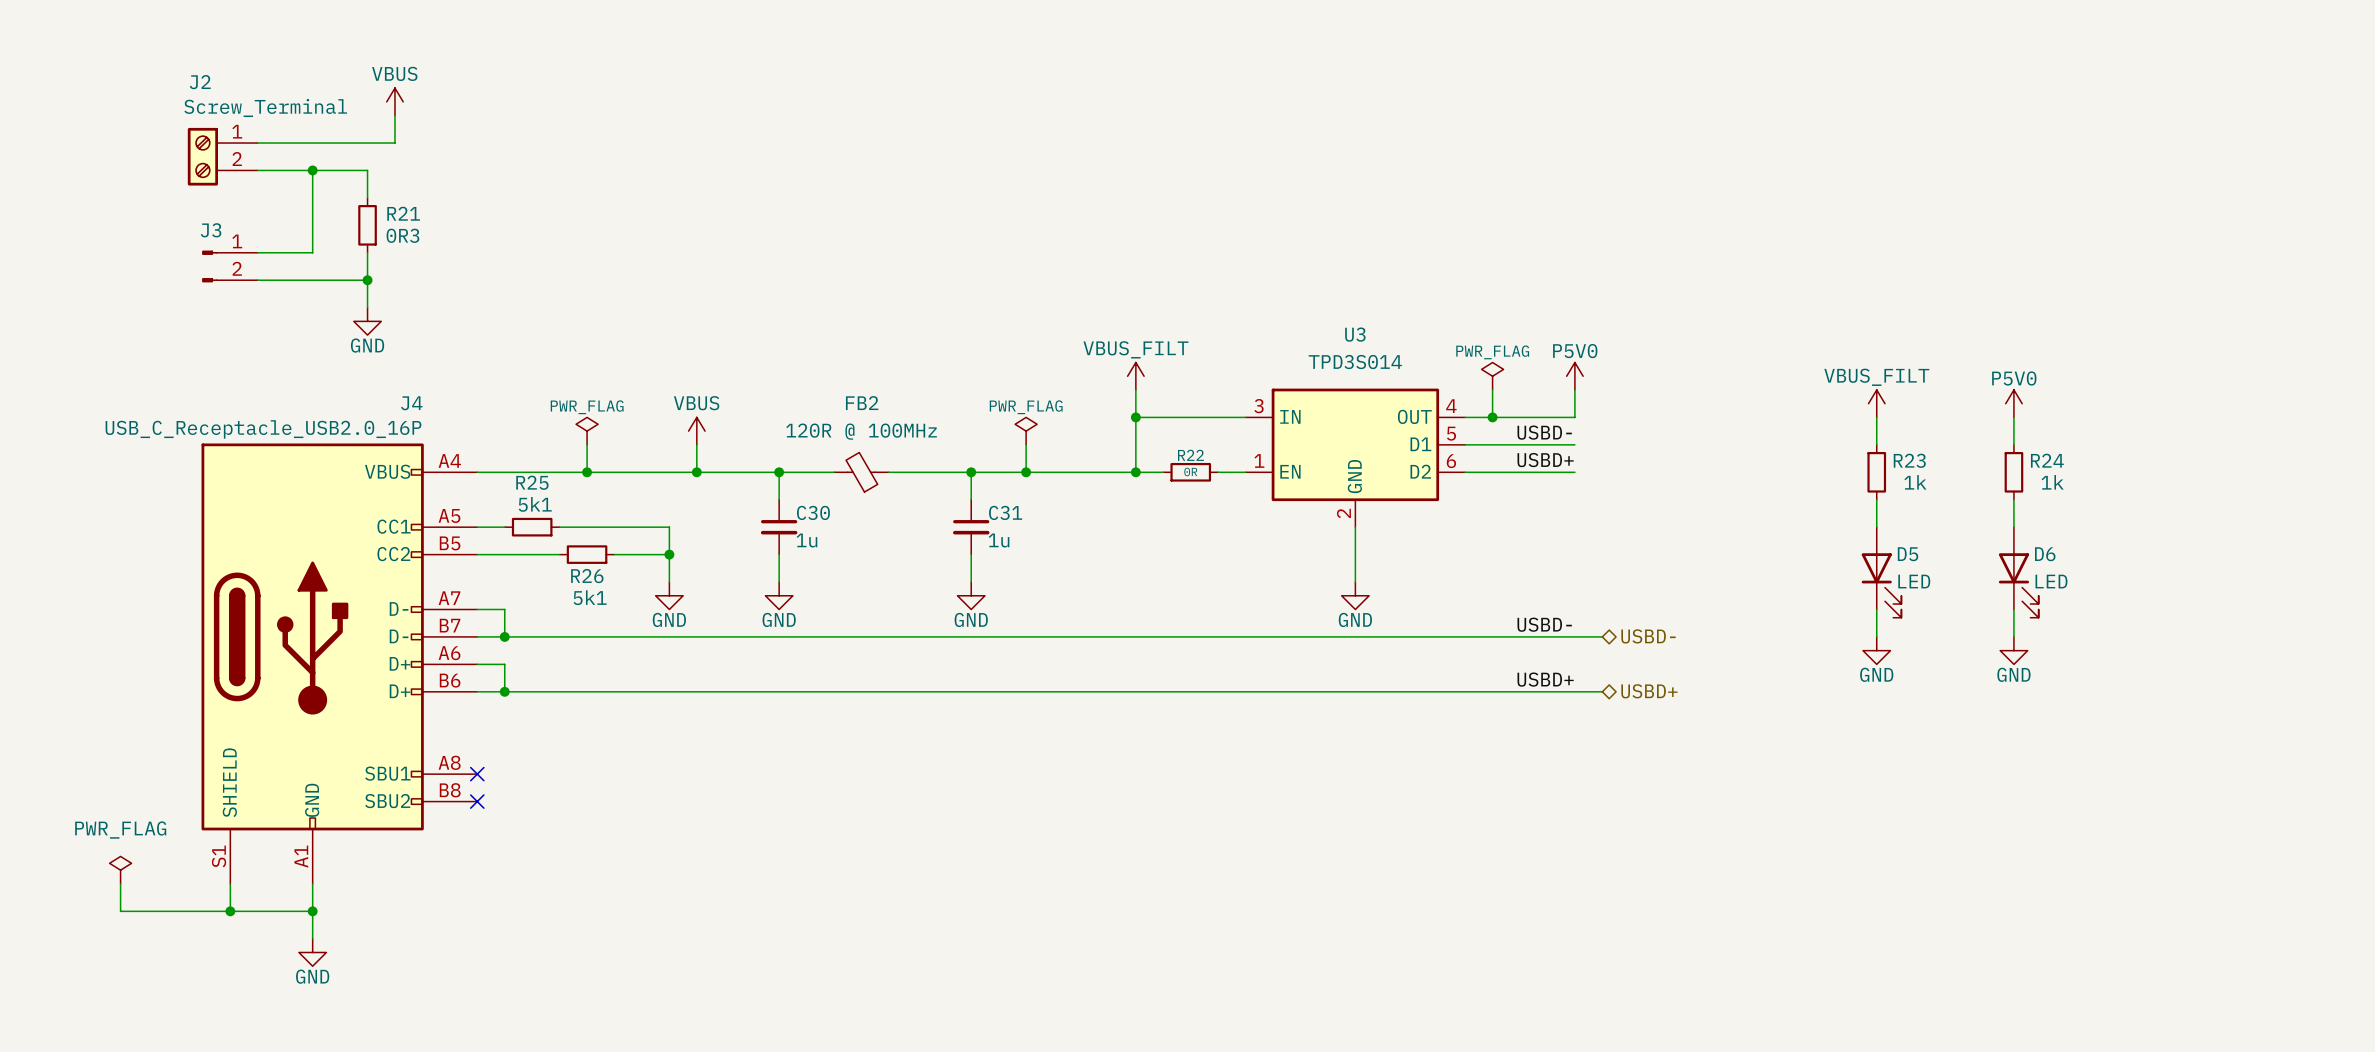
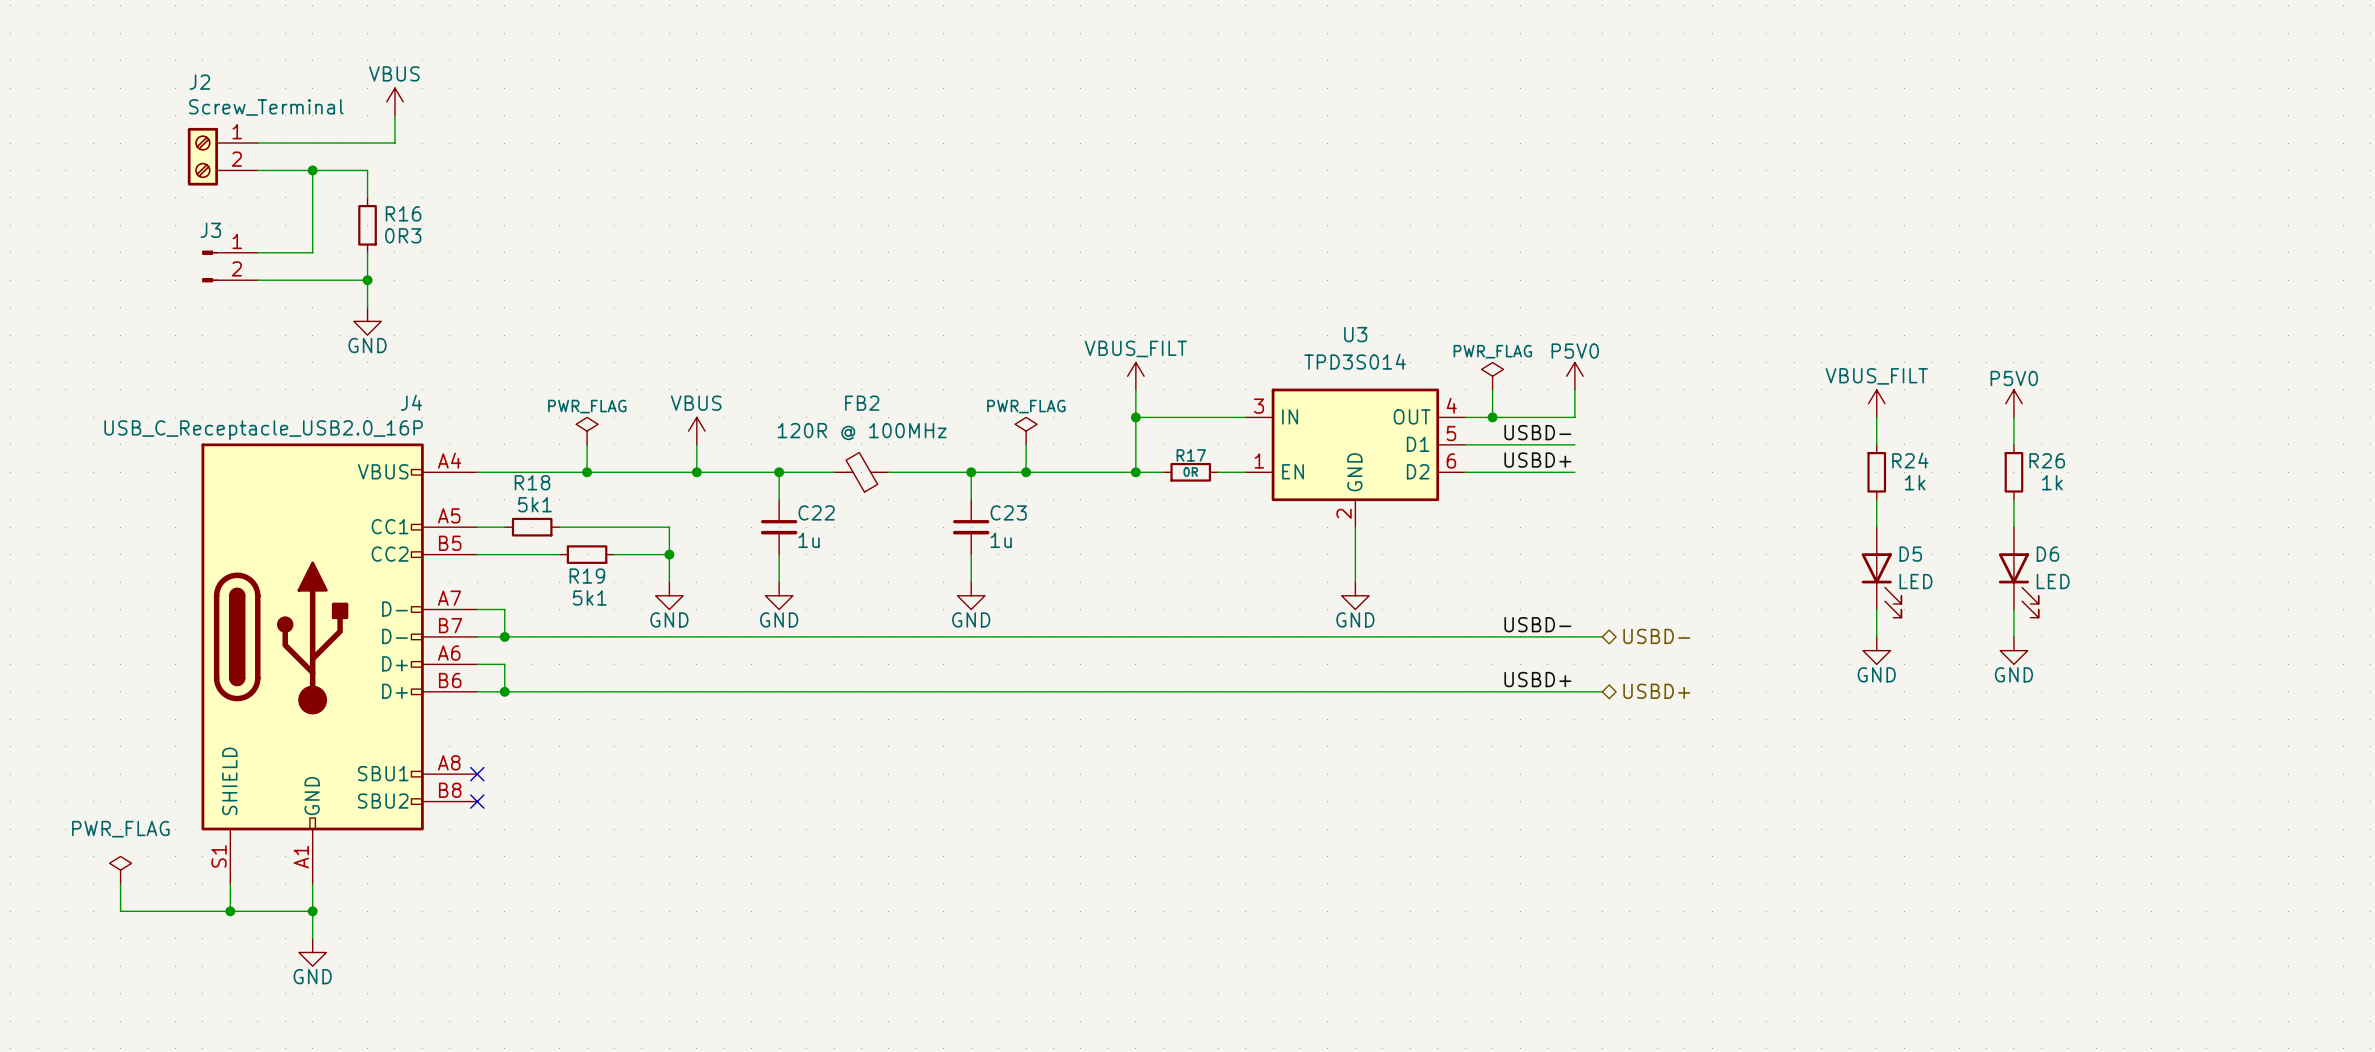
R21 name: R21 (403, 213) -> R16 (403, 213)
R22 name: R22 (1190, 455) -> R17 (1191, 455)
R23 name: R23 (1909, 460) -> R24 (1910, 460)
R24 name: R24 (2047, 460) -> R26 (2047, 460)
R25 name: R25 (532, 482) -> R18 (532, 482)
C30 name: C30 (813, 512) -> C22 (816, 512)
C31 name: C31 (1005, 512) -> C23 (1008, 512)
R26 name: R26 (587, 576) -> R19 (587, 576)

